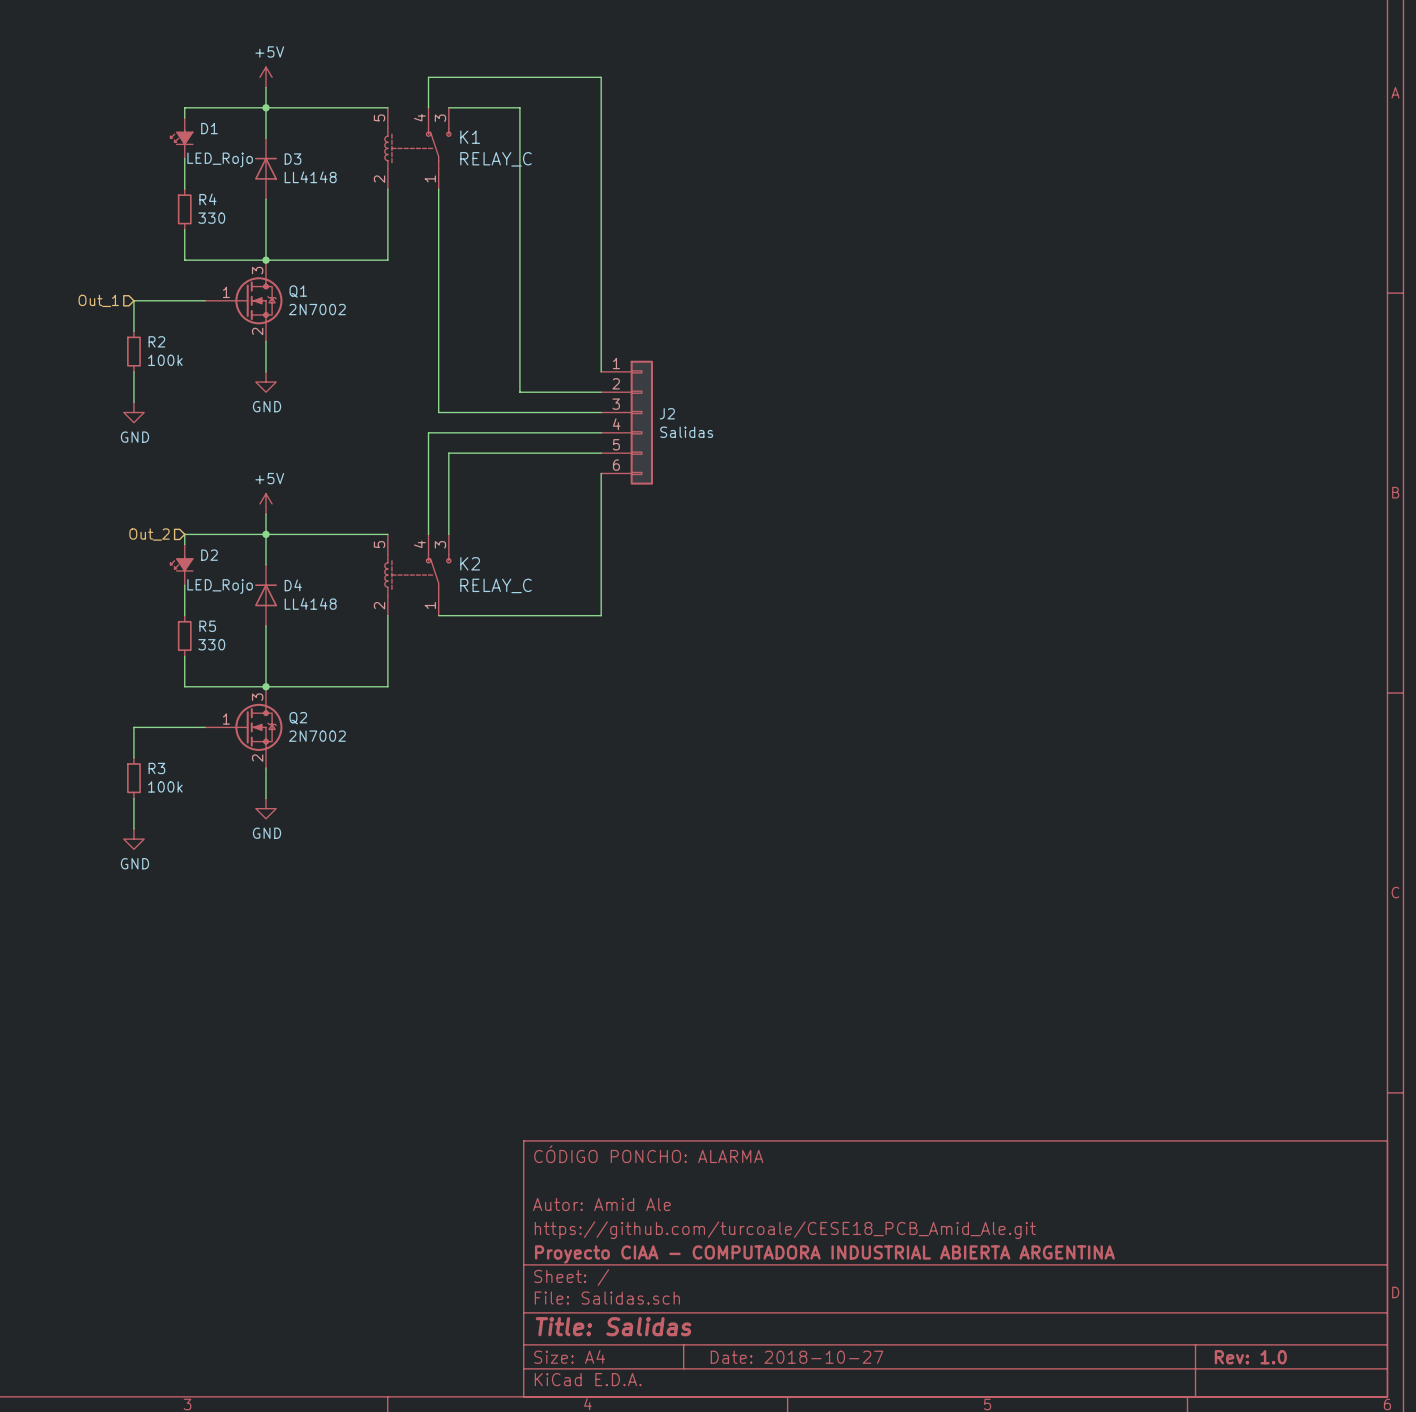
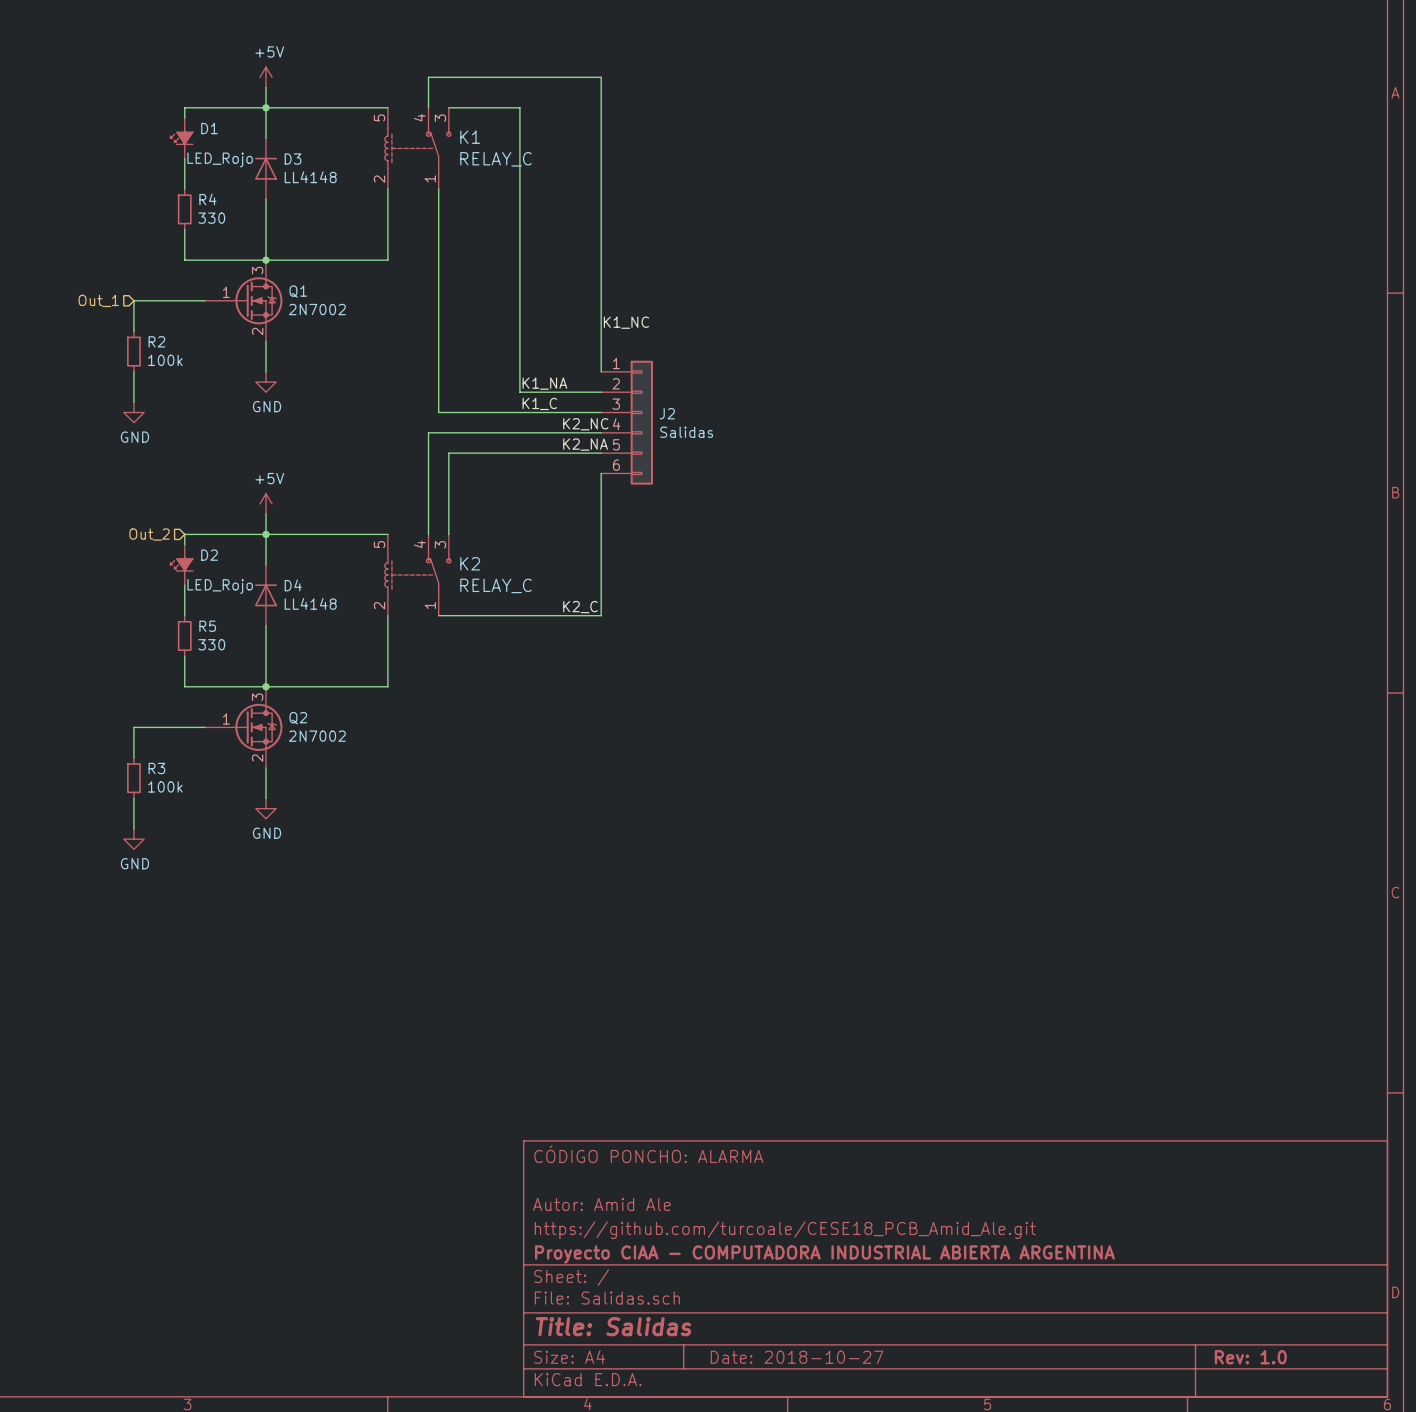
label: none -> K1_NC (626, 322)
label: none -> K1_NA (544, 383)
label: none -> K1_C (539, 403)
label: none -> K2_NC (585, 424)
label: none -> K2_NA (585, 444)
label: none -> K2_C (580, 607)

